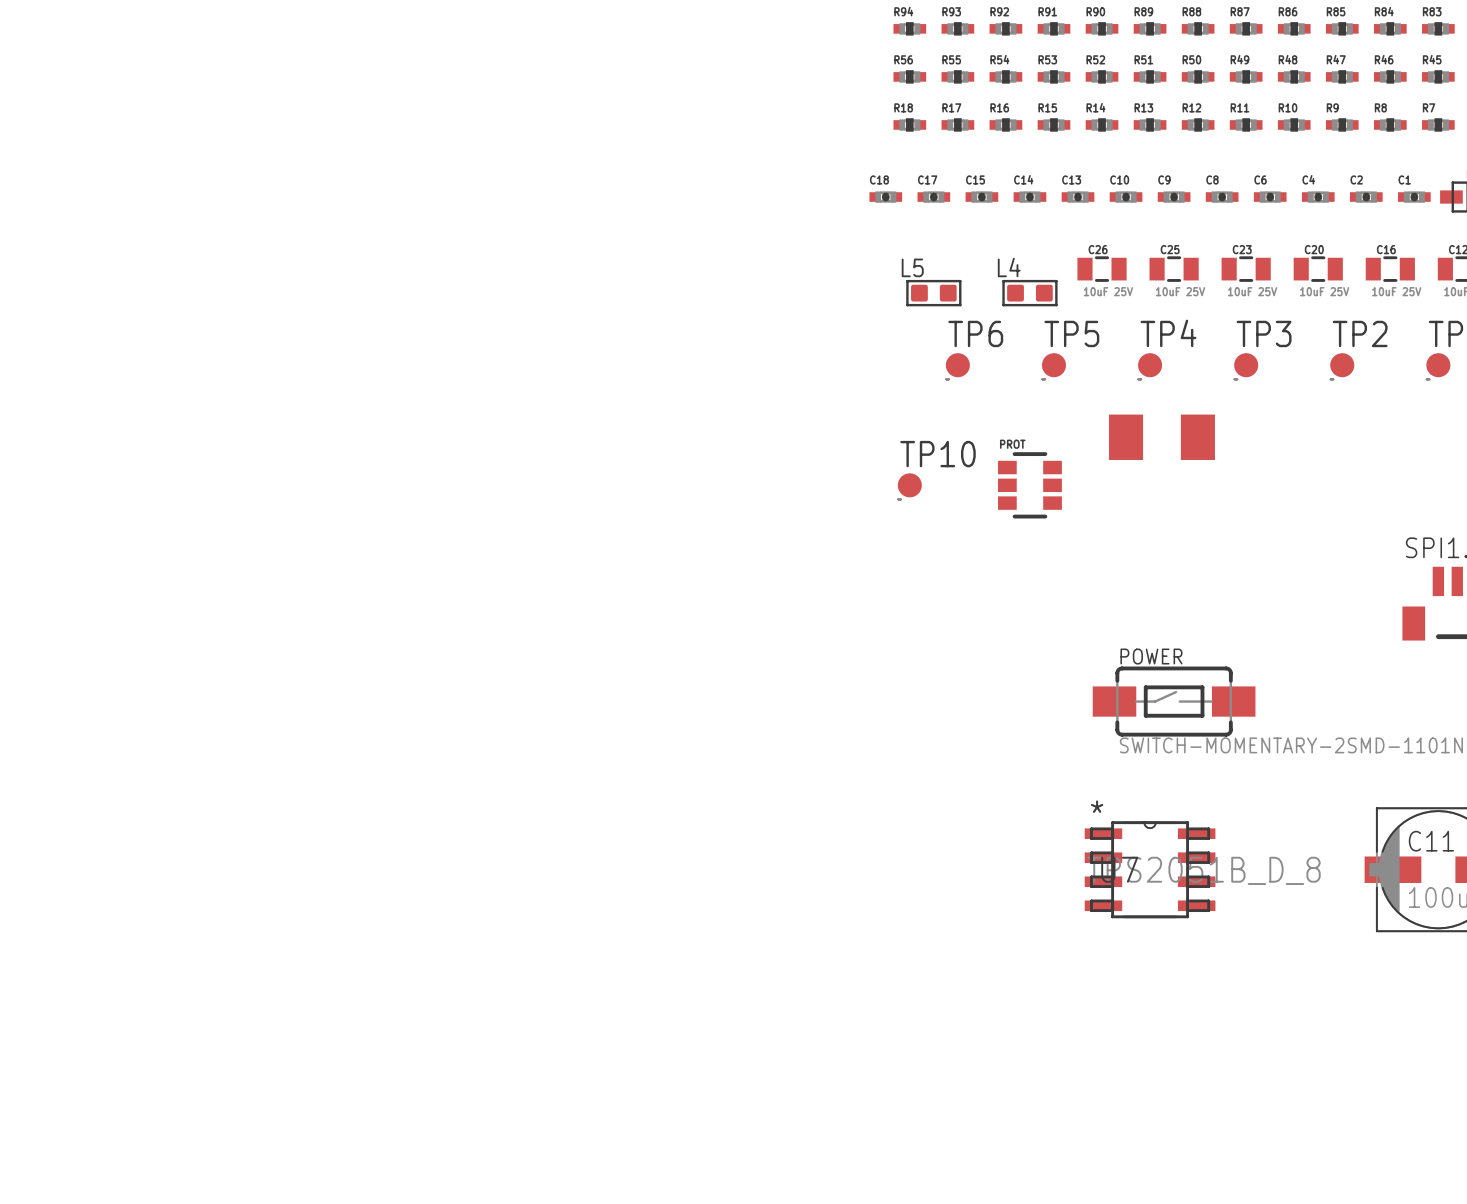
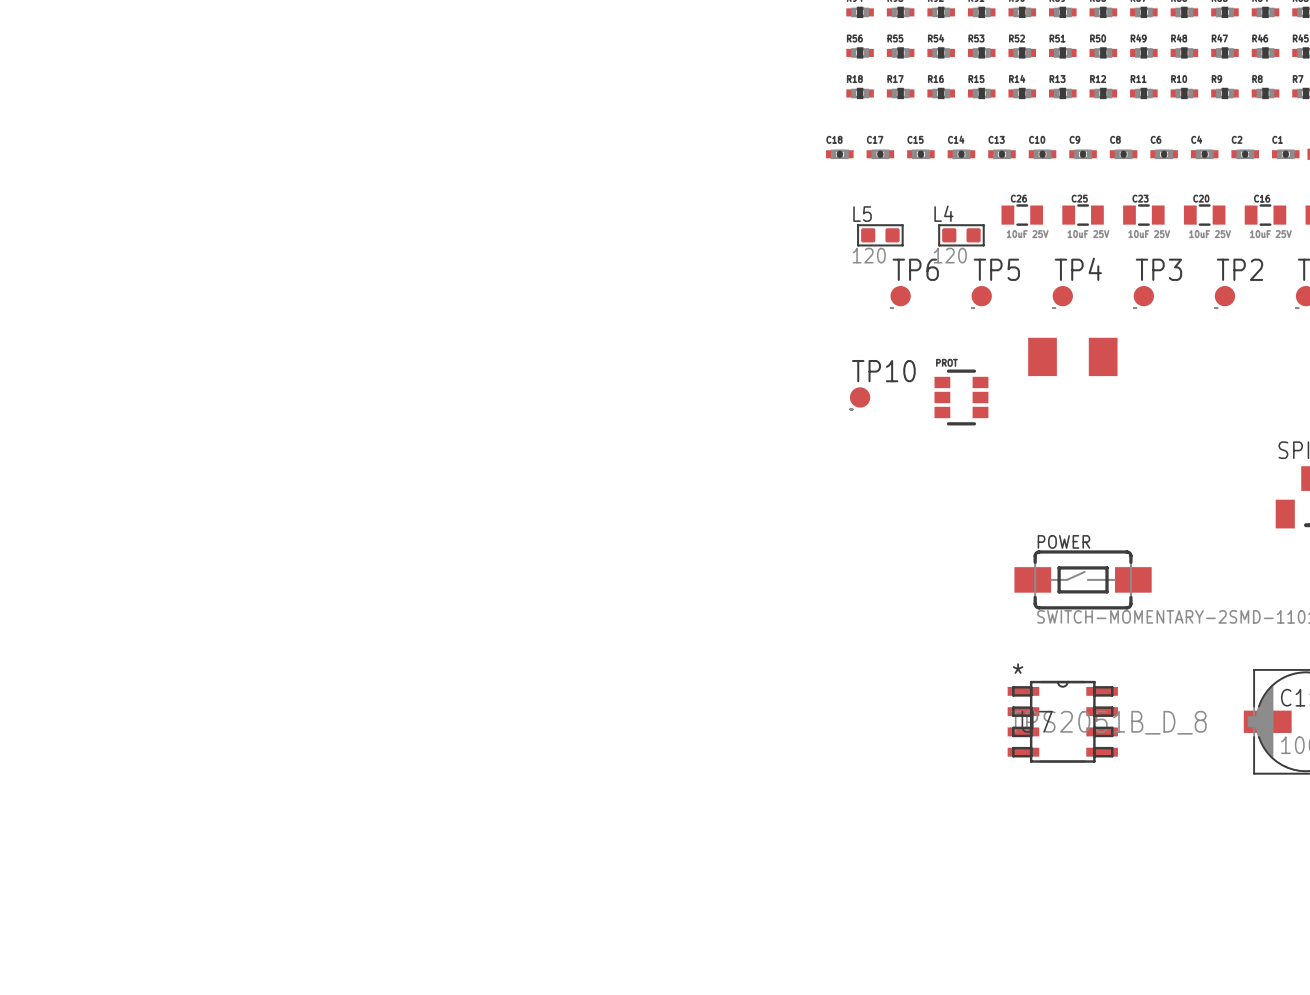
L5 value: none -> 120 (869, 255)
L4 value: none -> 120 (950, 255)

